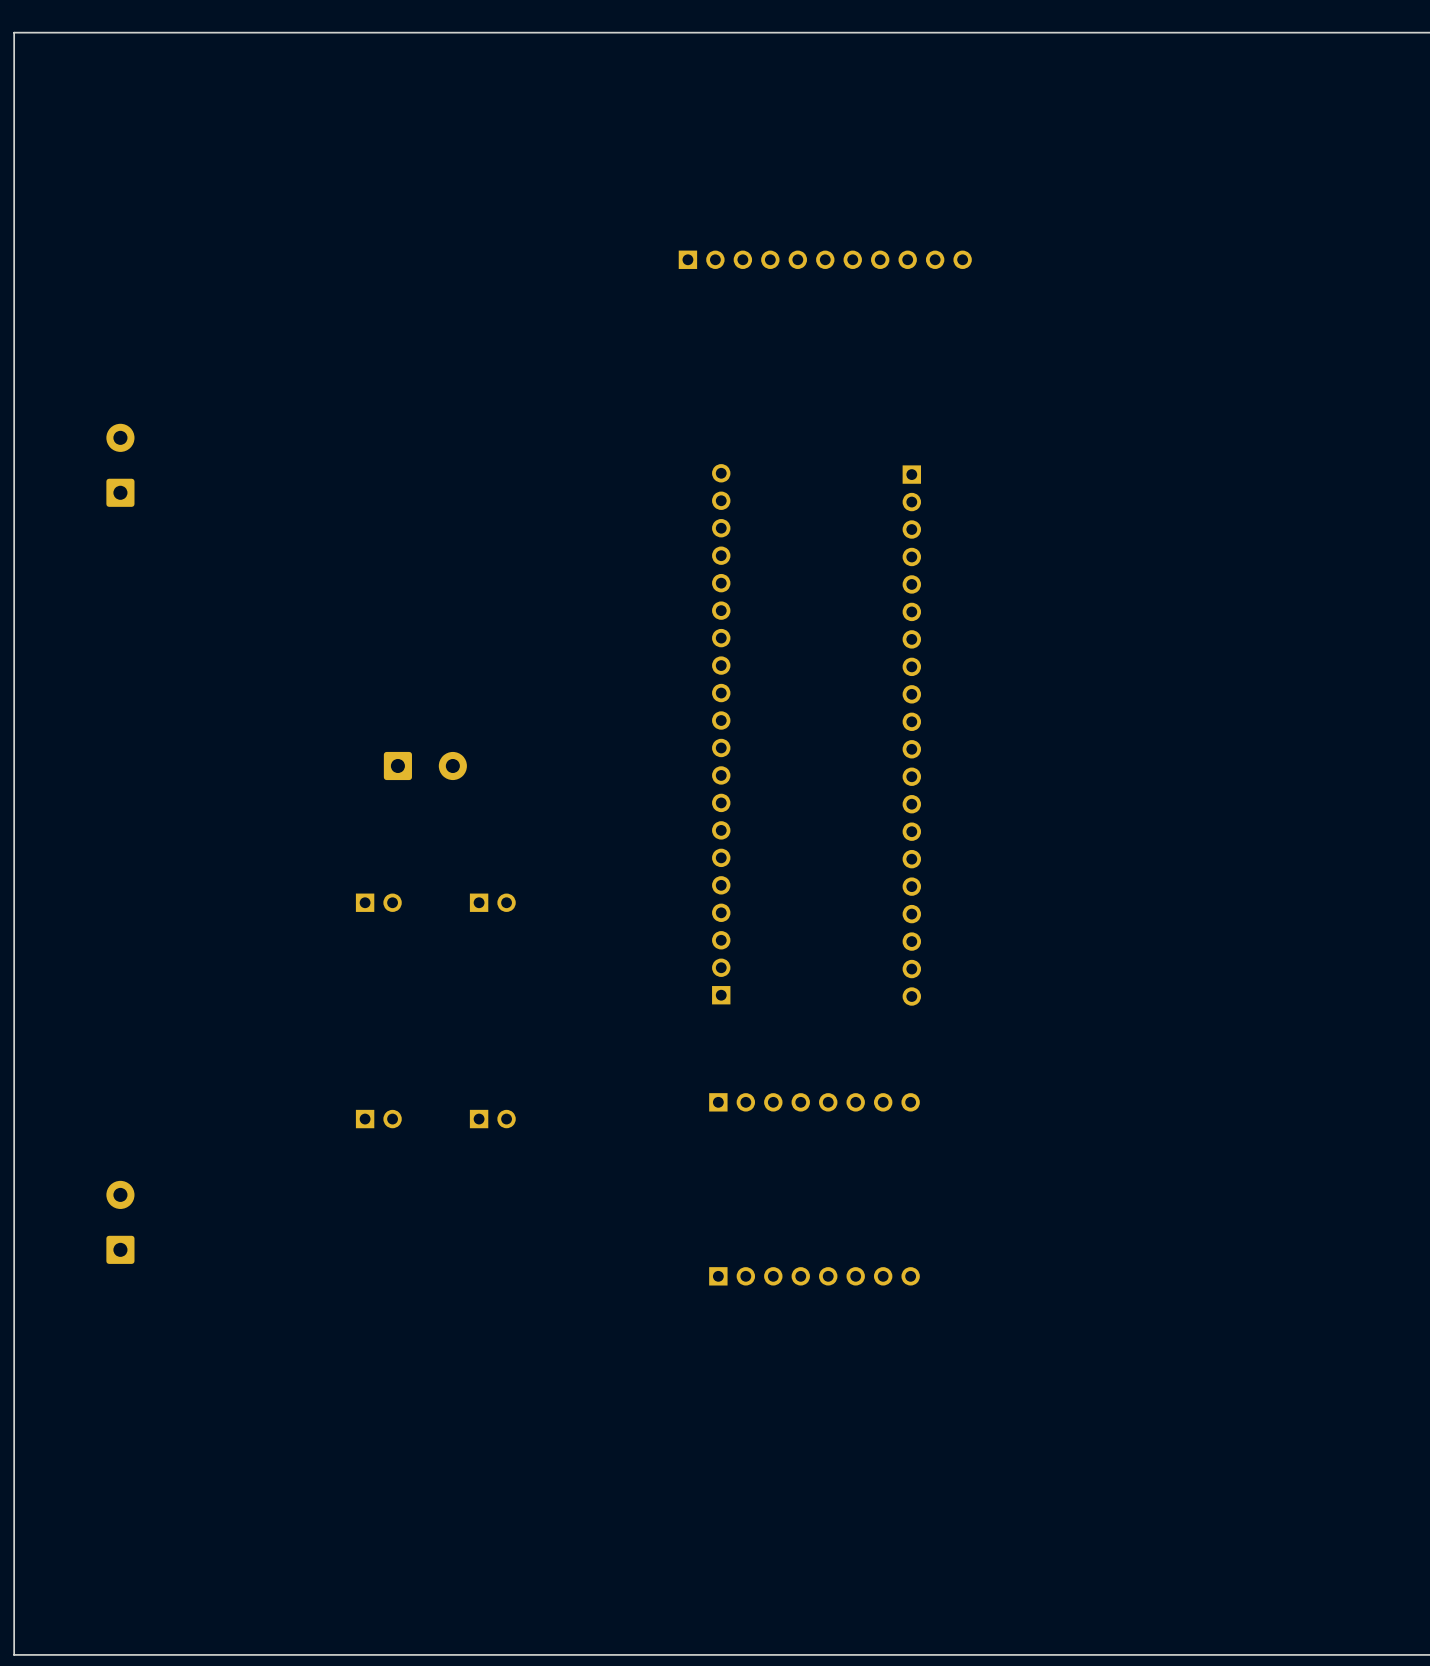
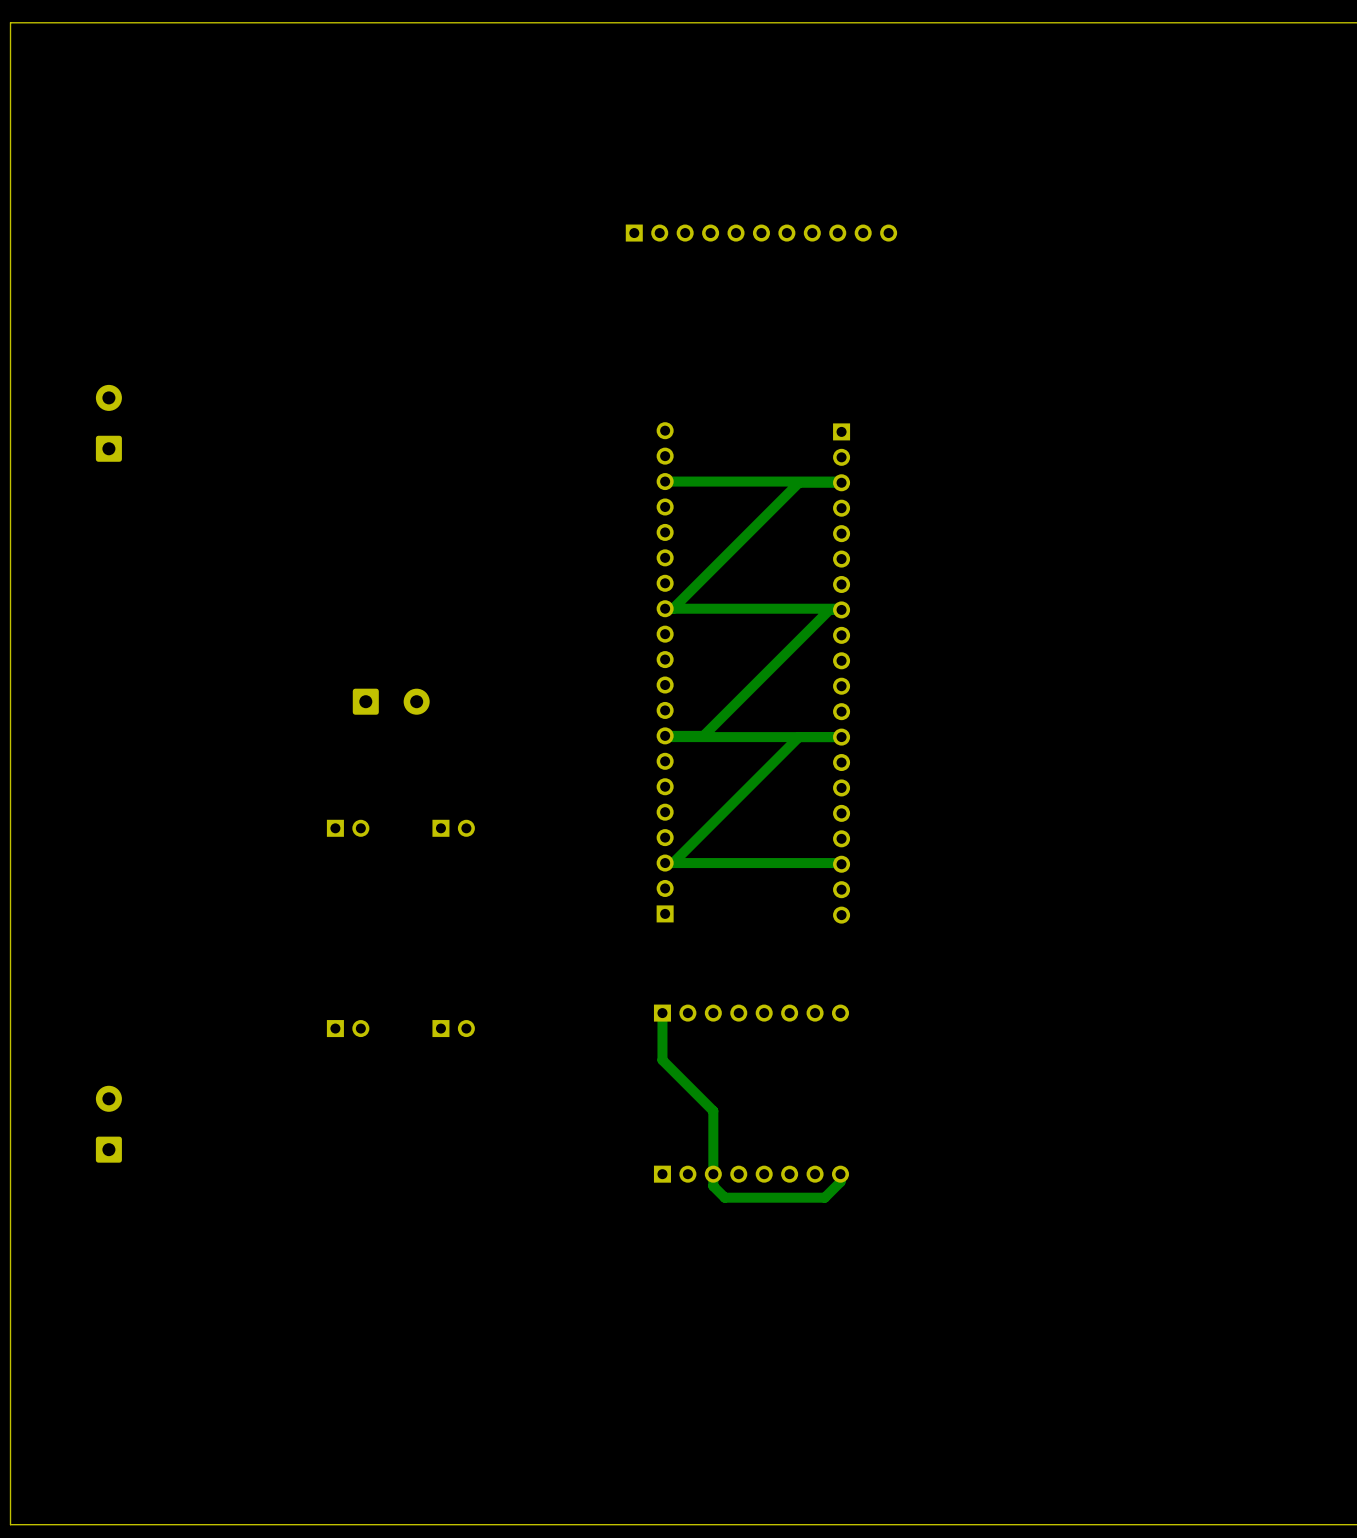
track: none -> (665, 481) (841, 482) (798, 482) (672, 608)
track: none -> (665, 608) (841, 609) (829, 609) (703, 735) (665, 735)
track: none -> (671, 735) (841, 737)
track: none -> (798, 737) (672, 863)
track: none -> (665, 863) (841, 864)
track: none -> (662, 1013) (662, 1060) (713, 1111) (713, 1186) (724, 1197) (824, 1197) (840, 1182) (840, 1174)

